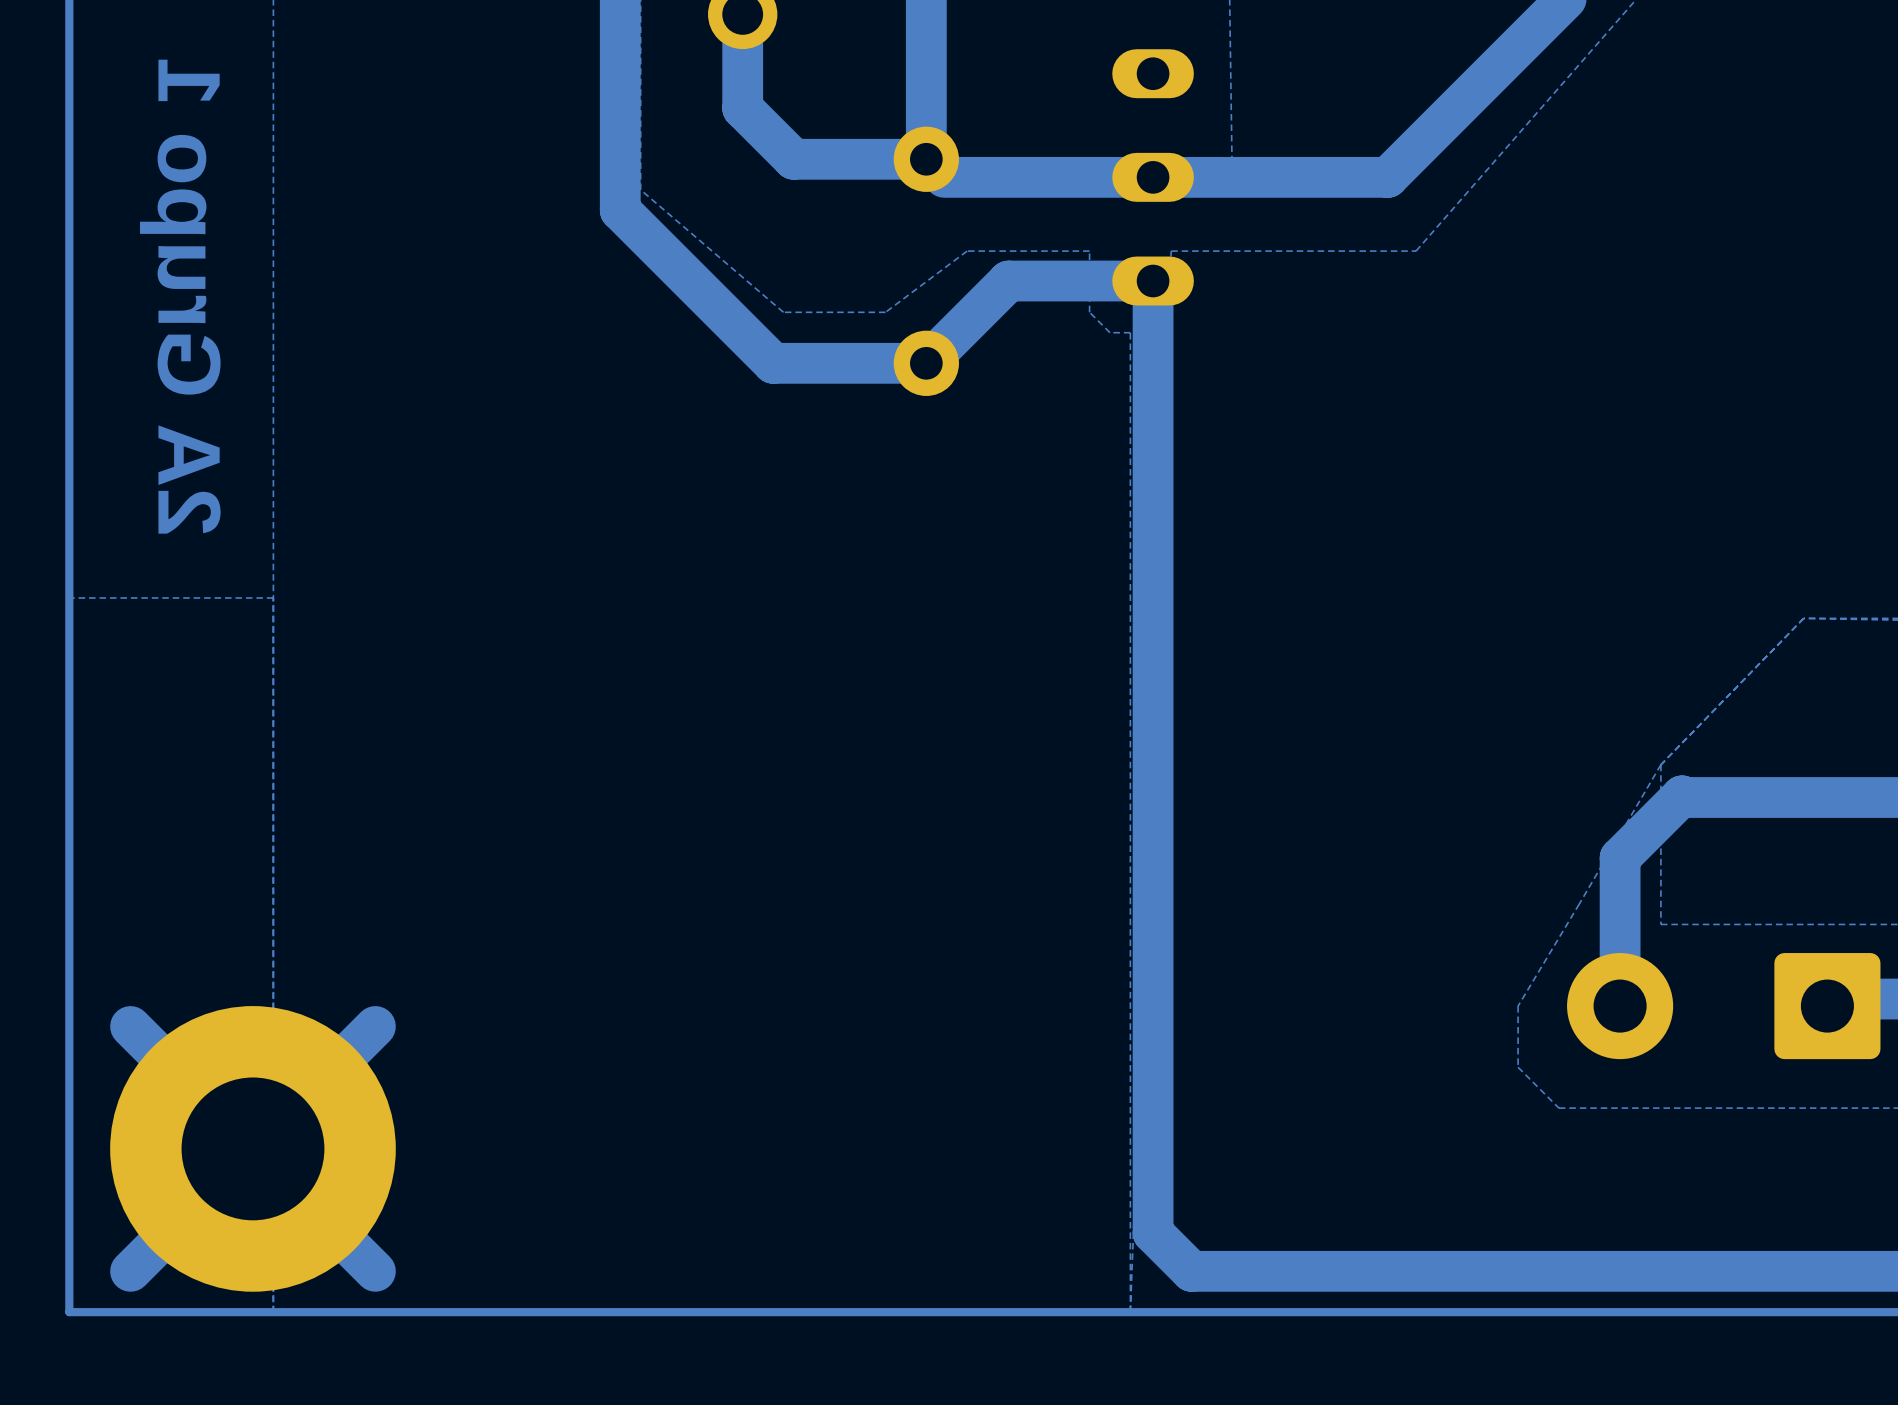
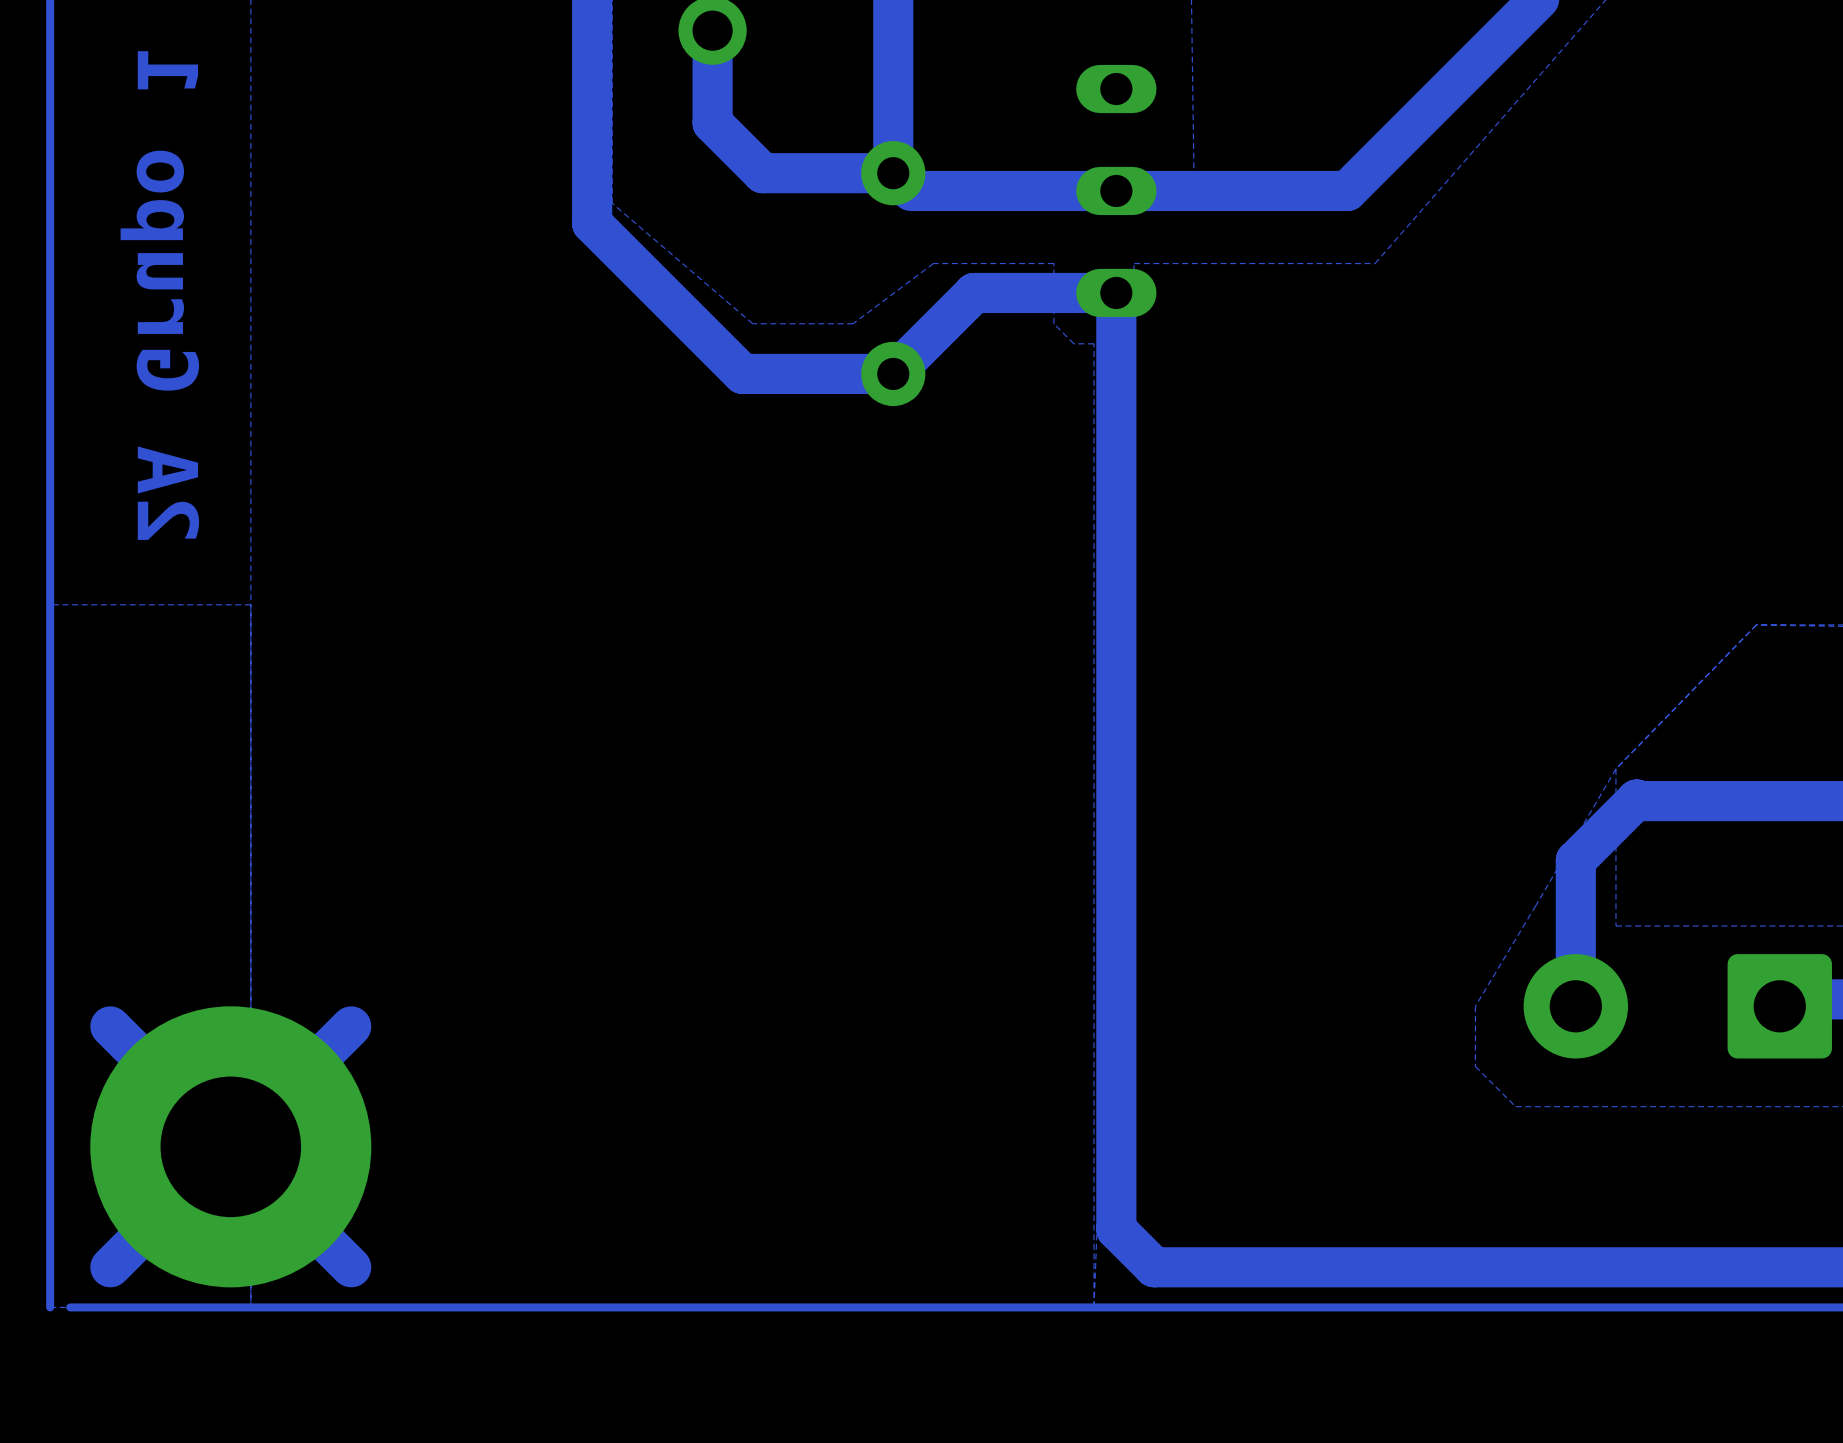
bottom track: (89, 1312) (69, 1312) -> none

